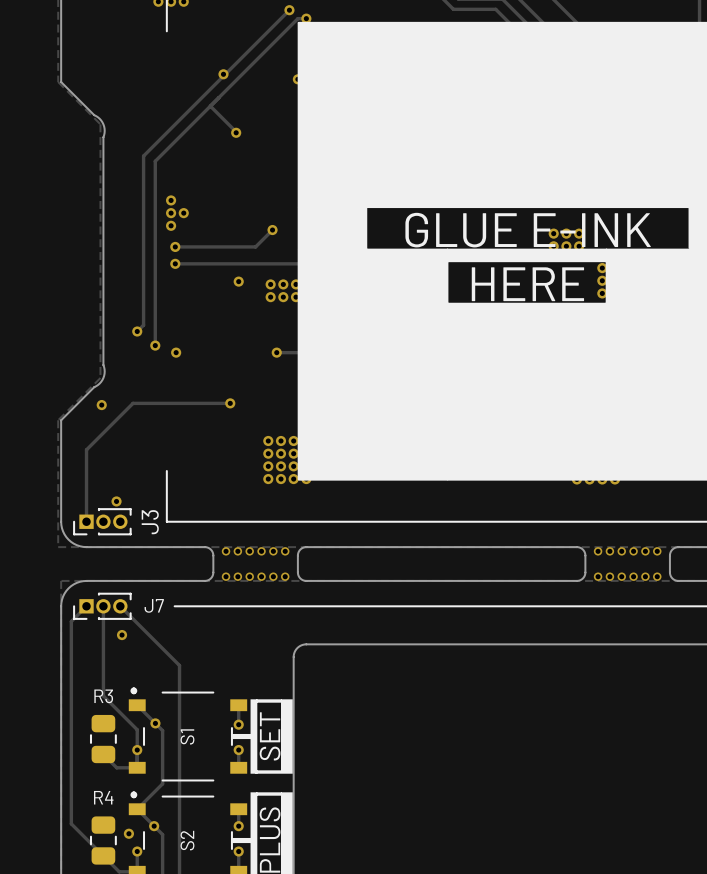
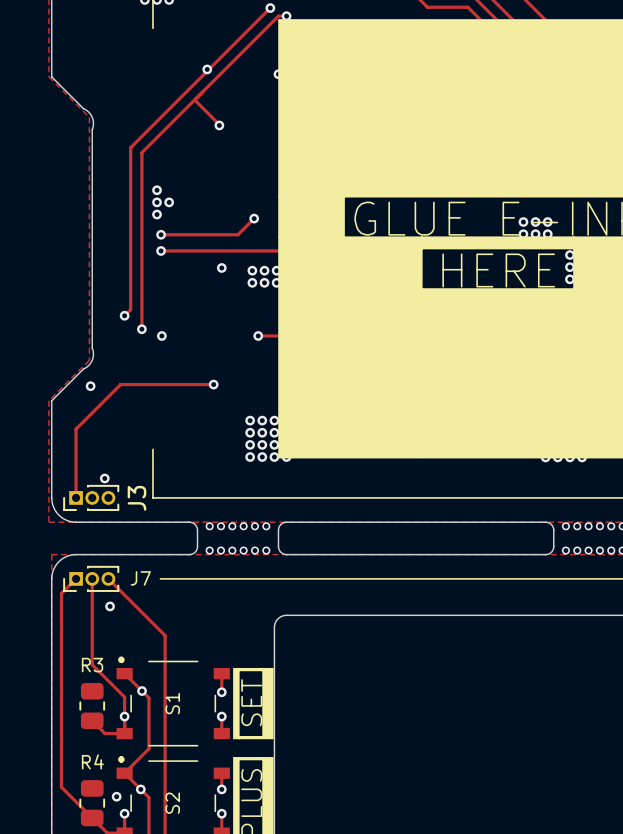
drawing: [231, 733, 253, 740] -> none
drawing: [231, 837, 253, 844] -> none

